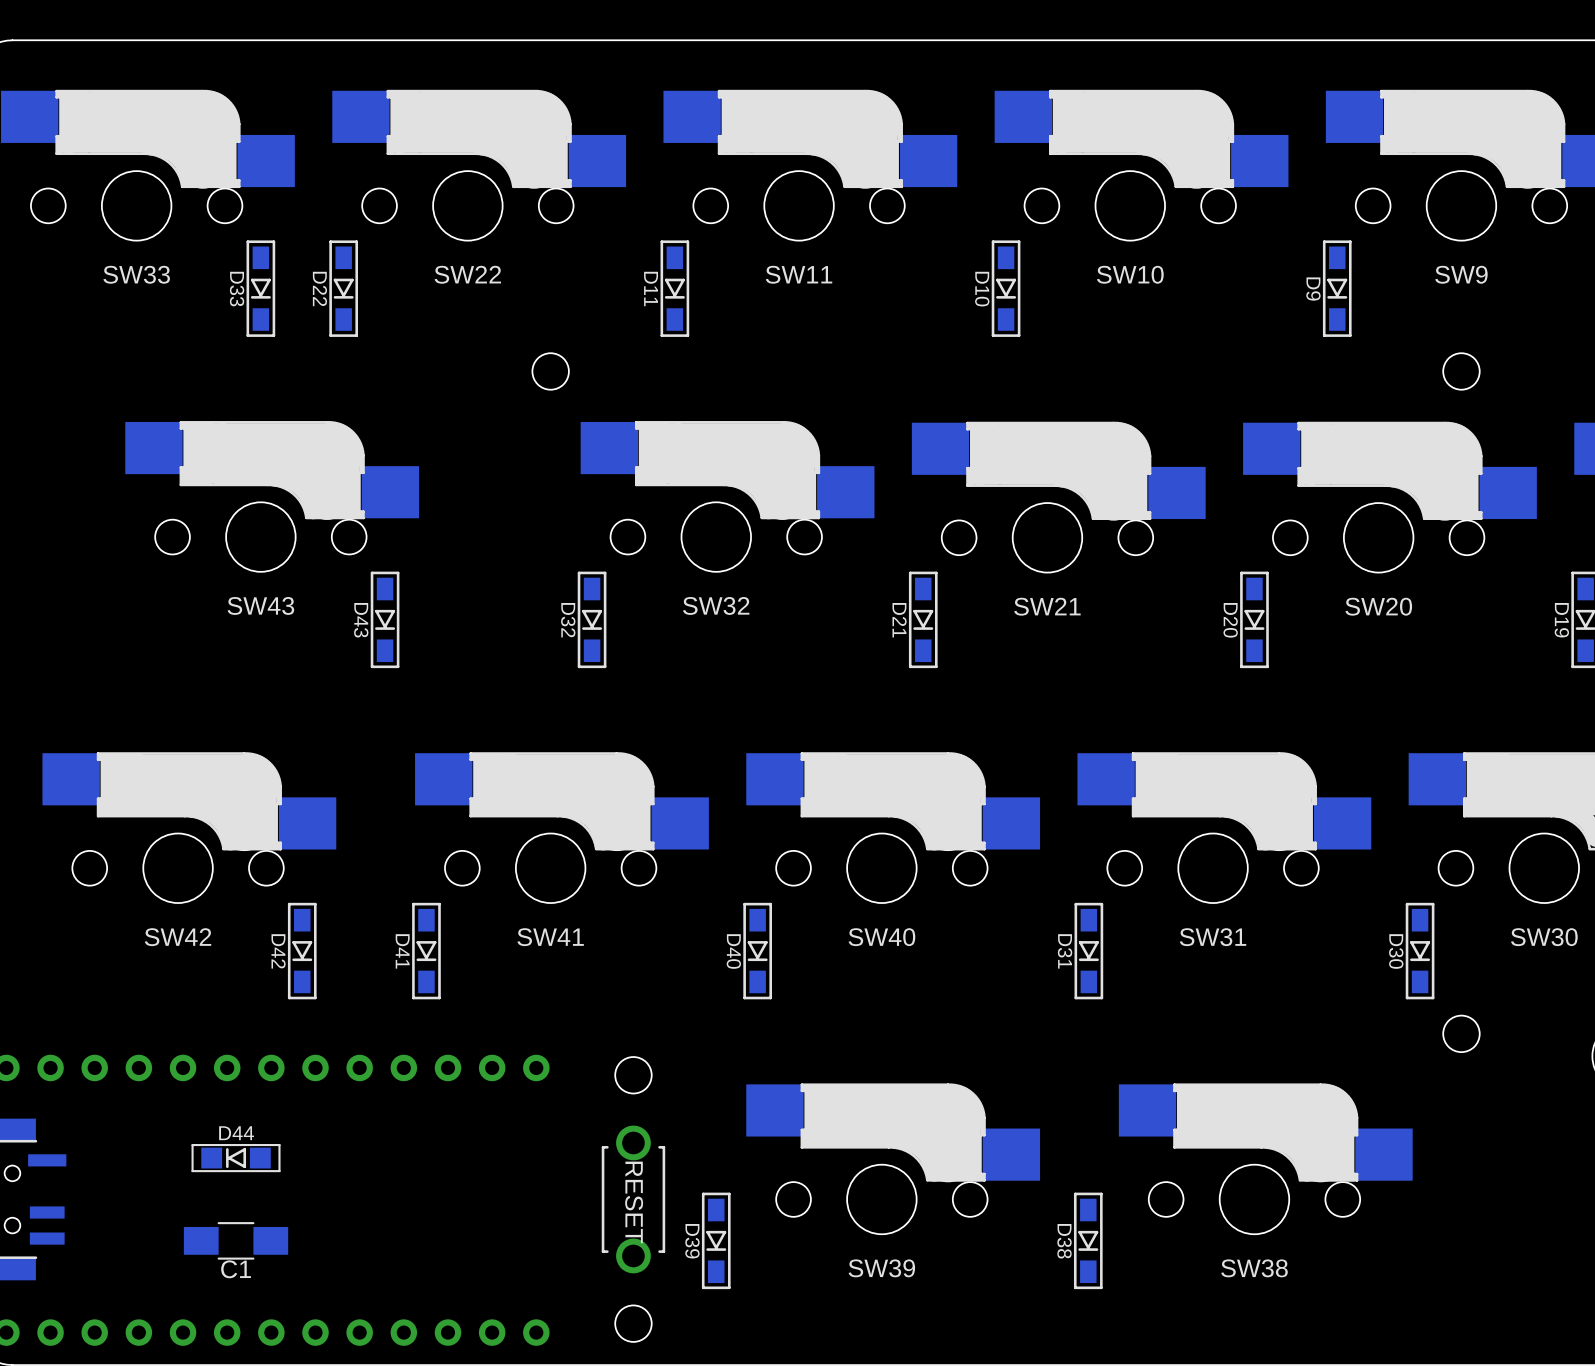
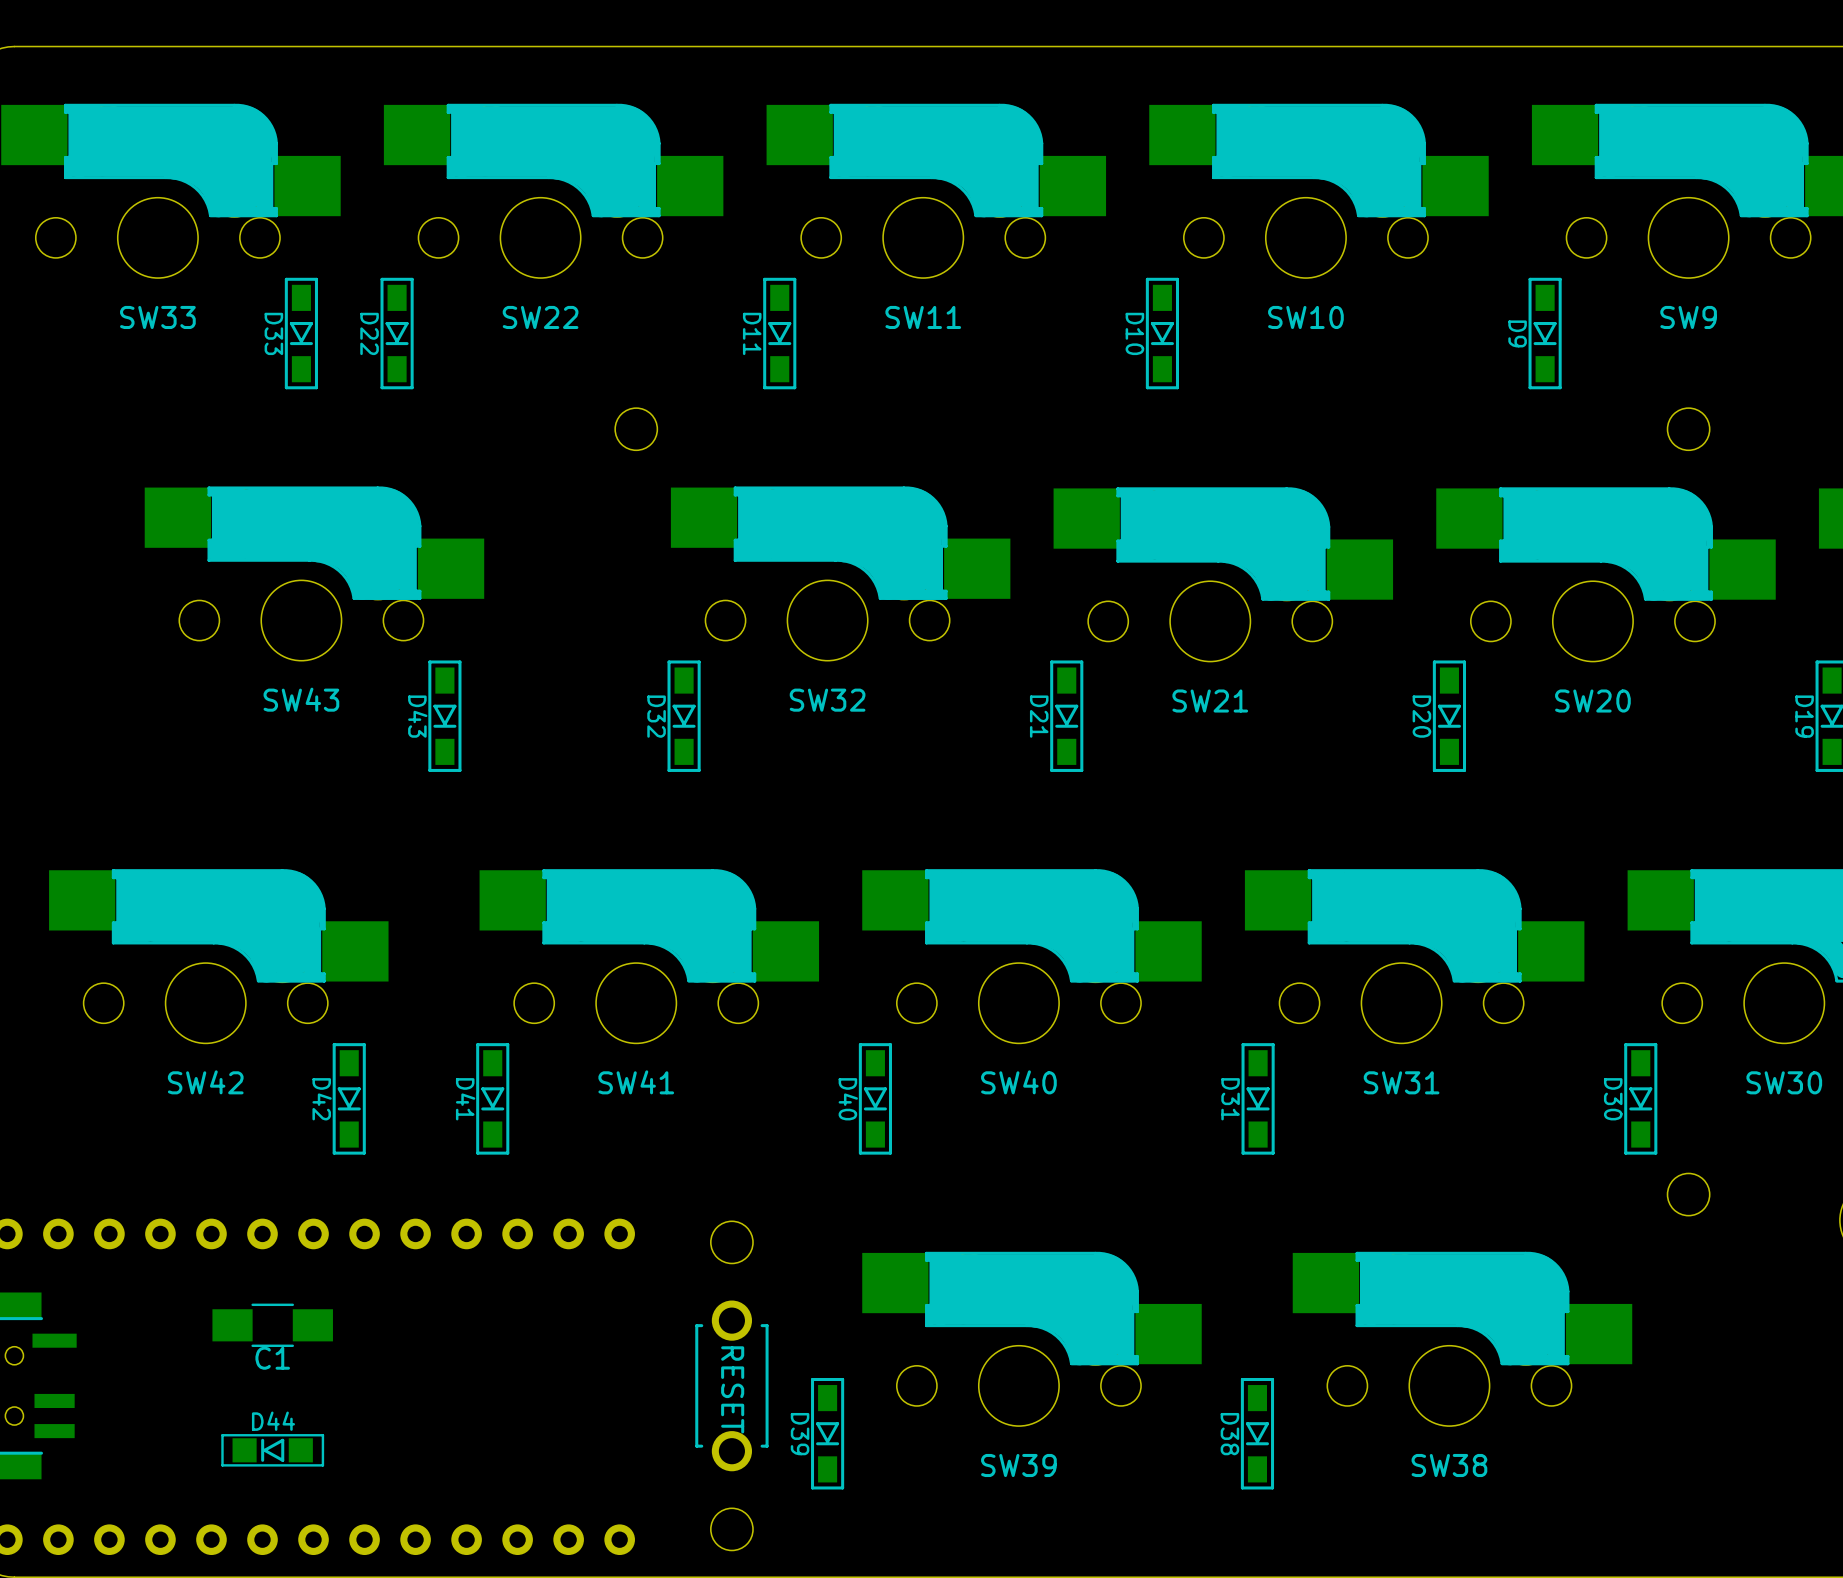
D44 position: (236, 1158) -> (272, 1450)
C1 position: (236, 1240) -> (272, 1325)

